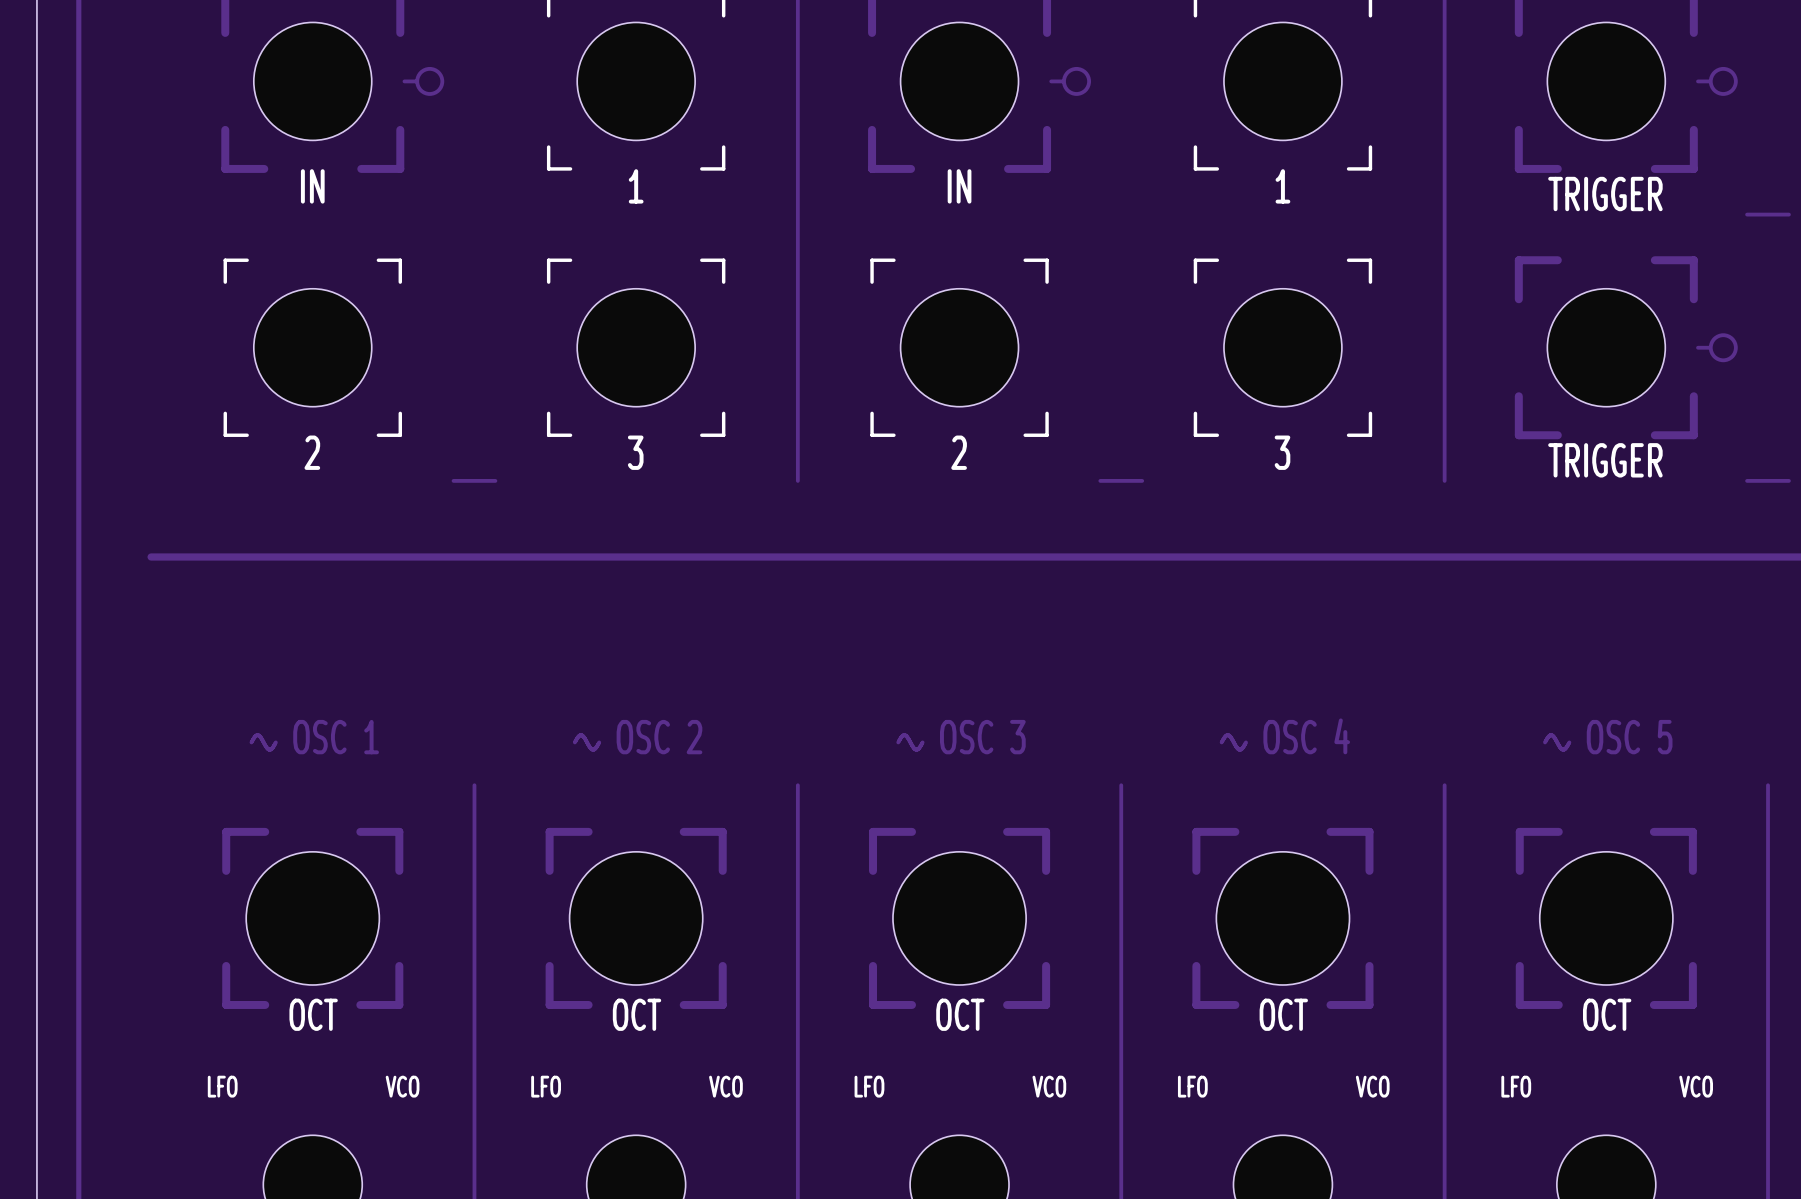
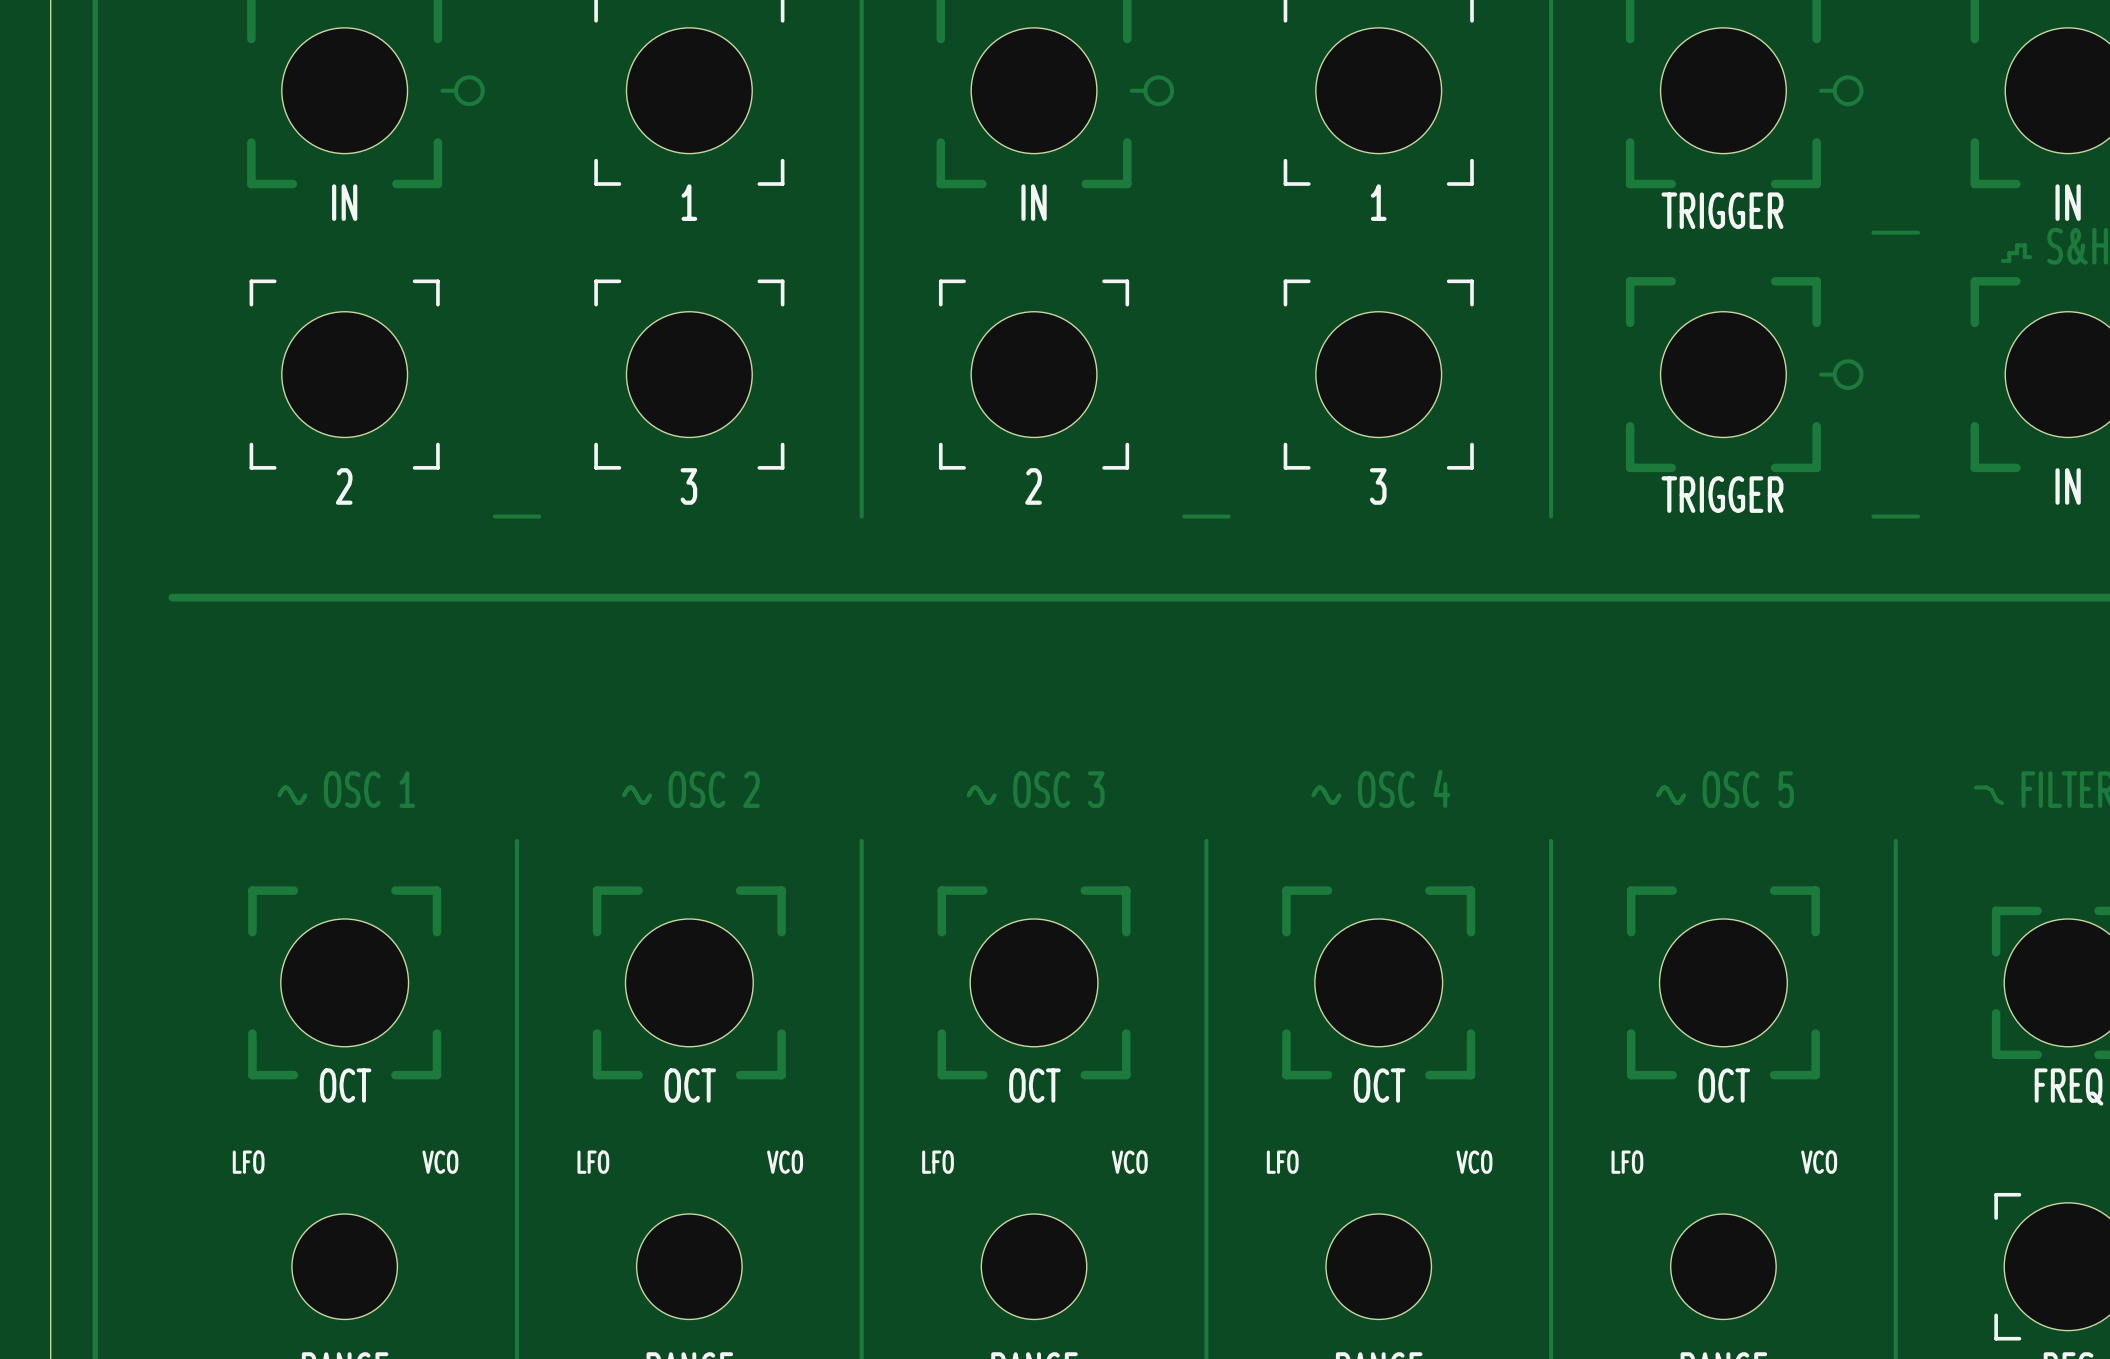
part footprint: [246, 851, 380, 986] -> [280, 919, 409, 1047]
part footprint: [569, 851, 703, 986] -> [625, 919, 754, 1047]
part footprint: [892, 851, 1027, 986] -> [970, 919, 1098, 1047]
part footprint: [1216, 851, 1350, 986] -> [1314, 919, 1443, 1047]
part footprint: [1539, 851, 1673, 986] -> [1659, 919, 1788, 1047]

